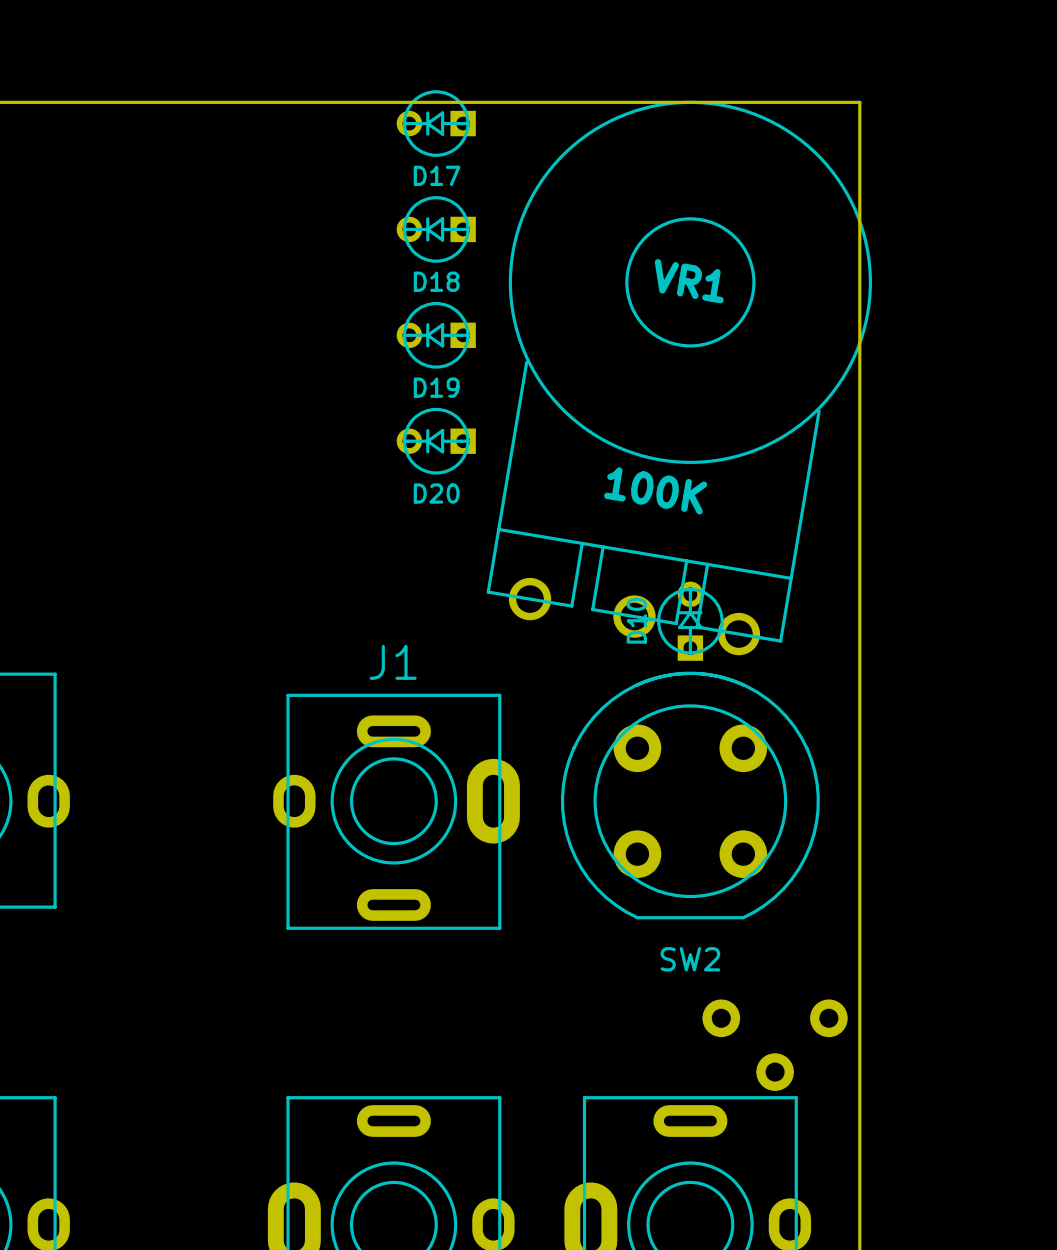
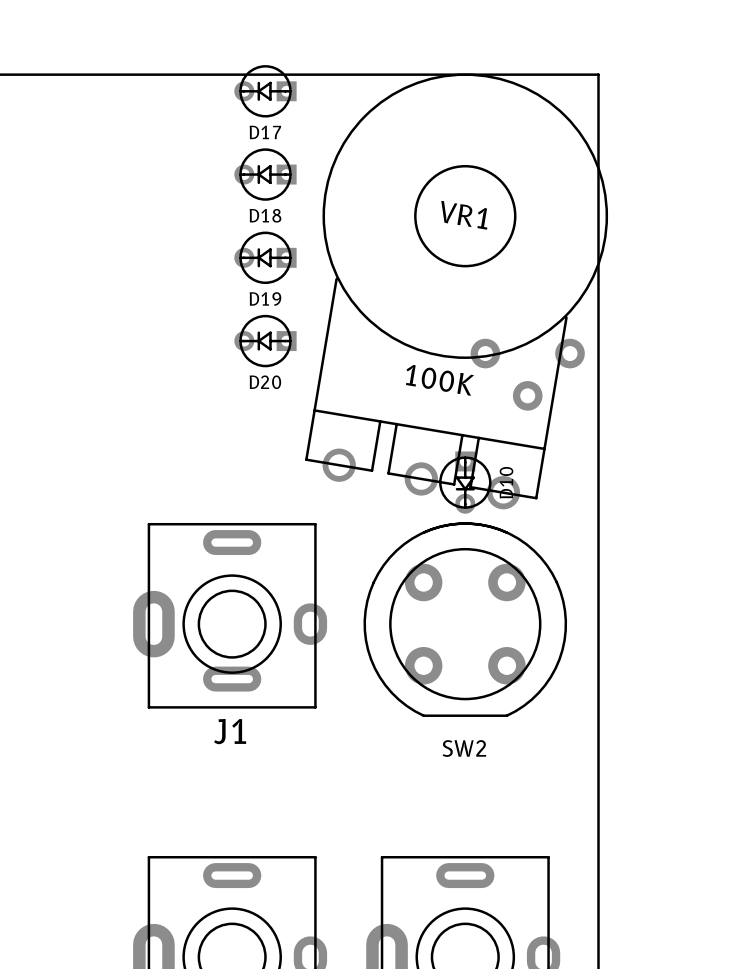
part: none -> (527, 374)
D10 rotation: 0° (690, 621) -> 180° (465, 482)
J1 rotation: 0° (396, 811) -> 180° (230, 615)
part: (775, 1045) -> none

